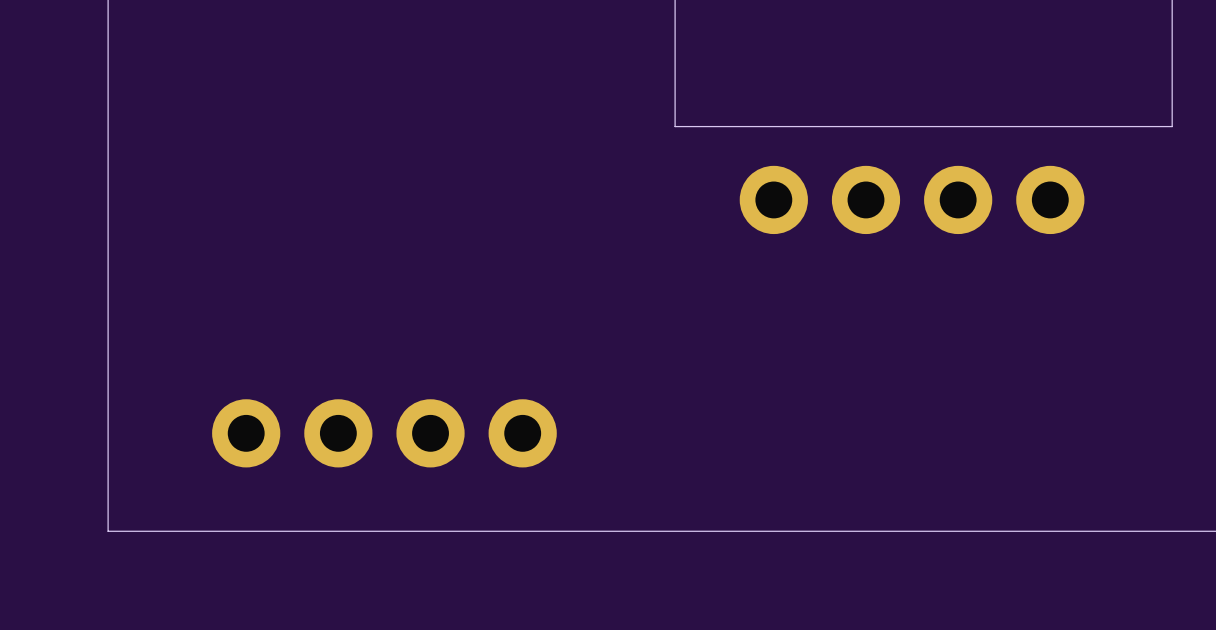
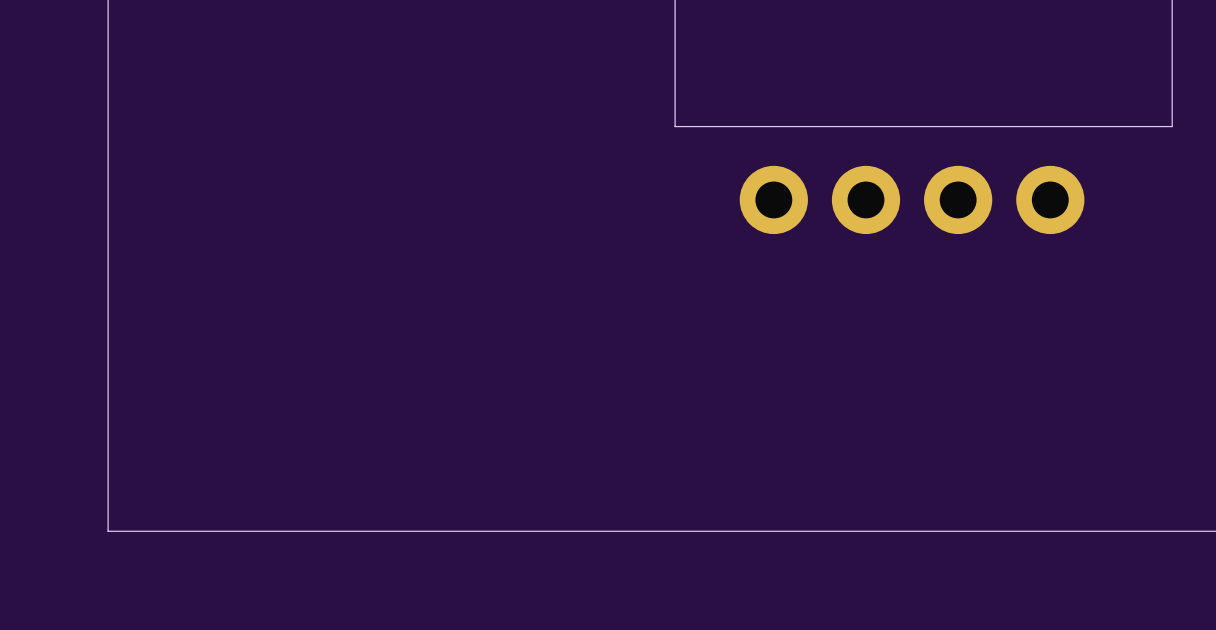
part: (384, 433) -> none

